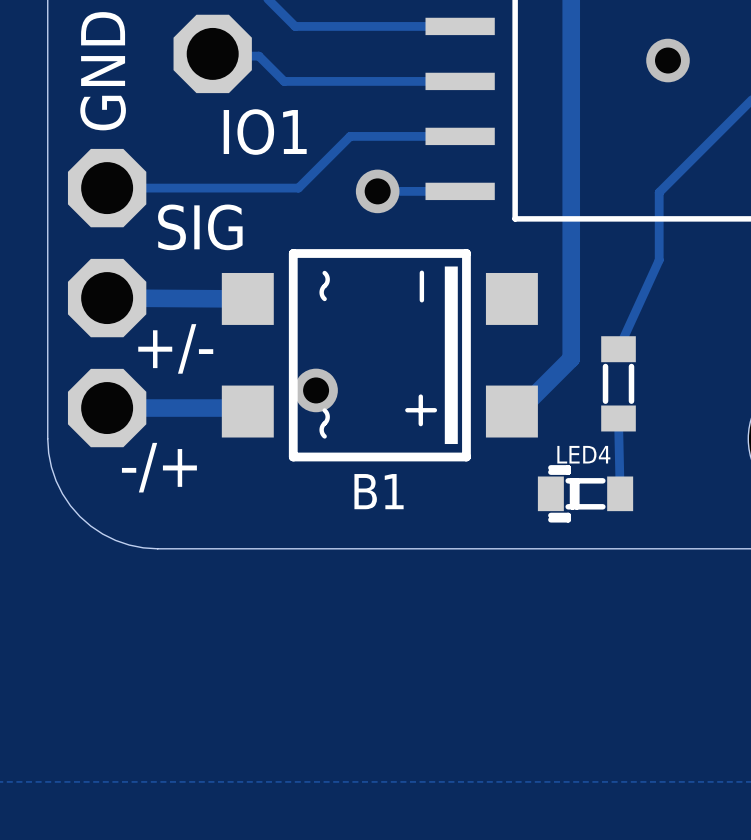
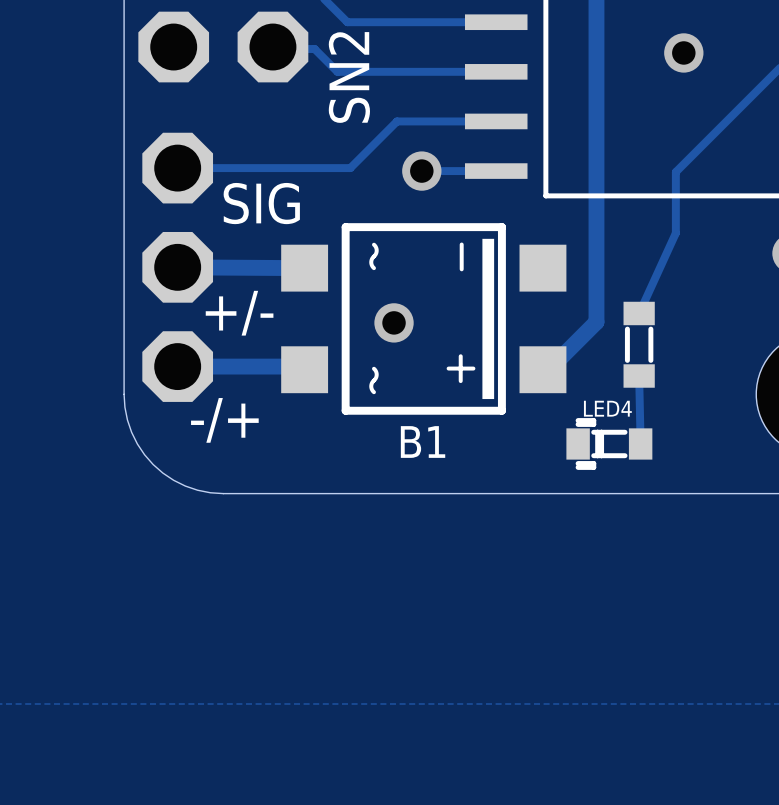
part: none -> (173, 47)
GND name: GND (103, 71) -> none
IO1 name: IO1 (265, 132) -> SN2 (349, 77)
via position: (316, 390) -> (394, 322)

